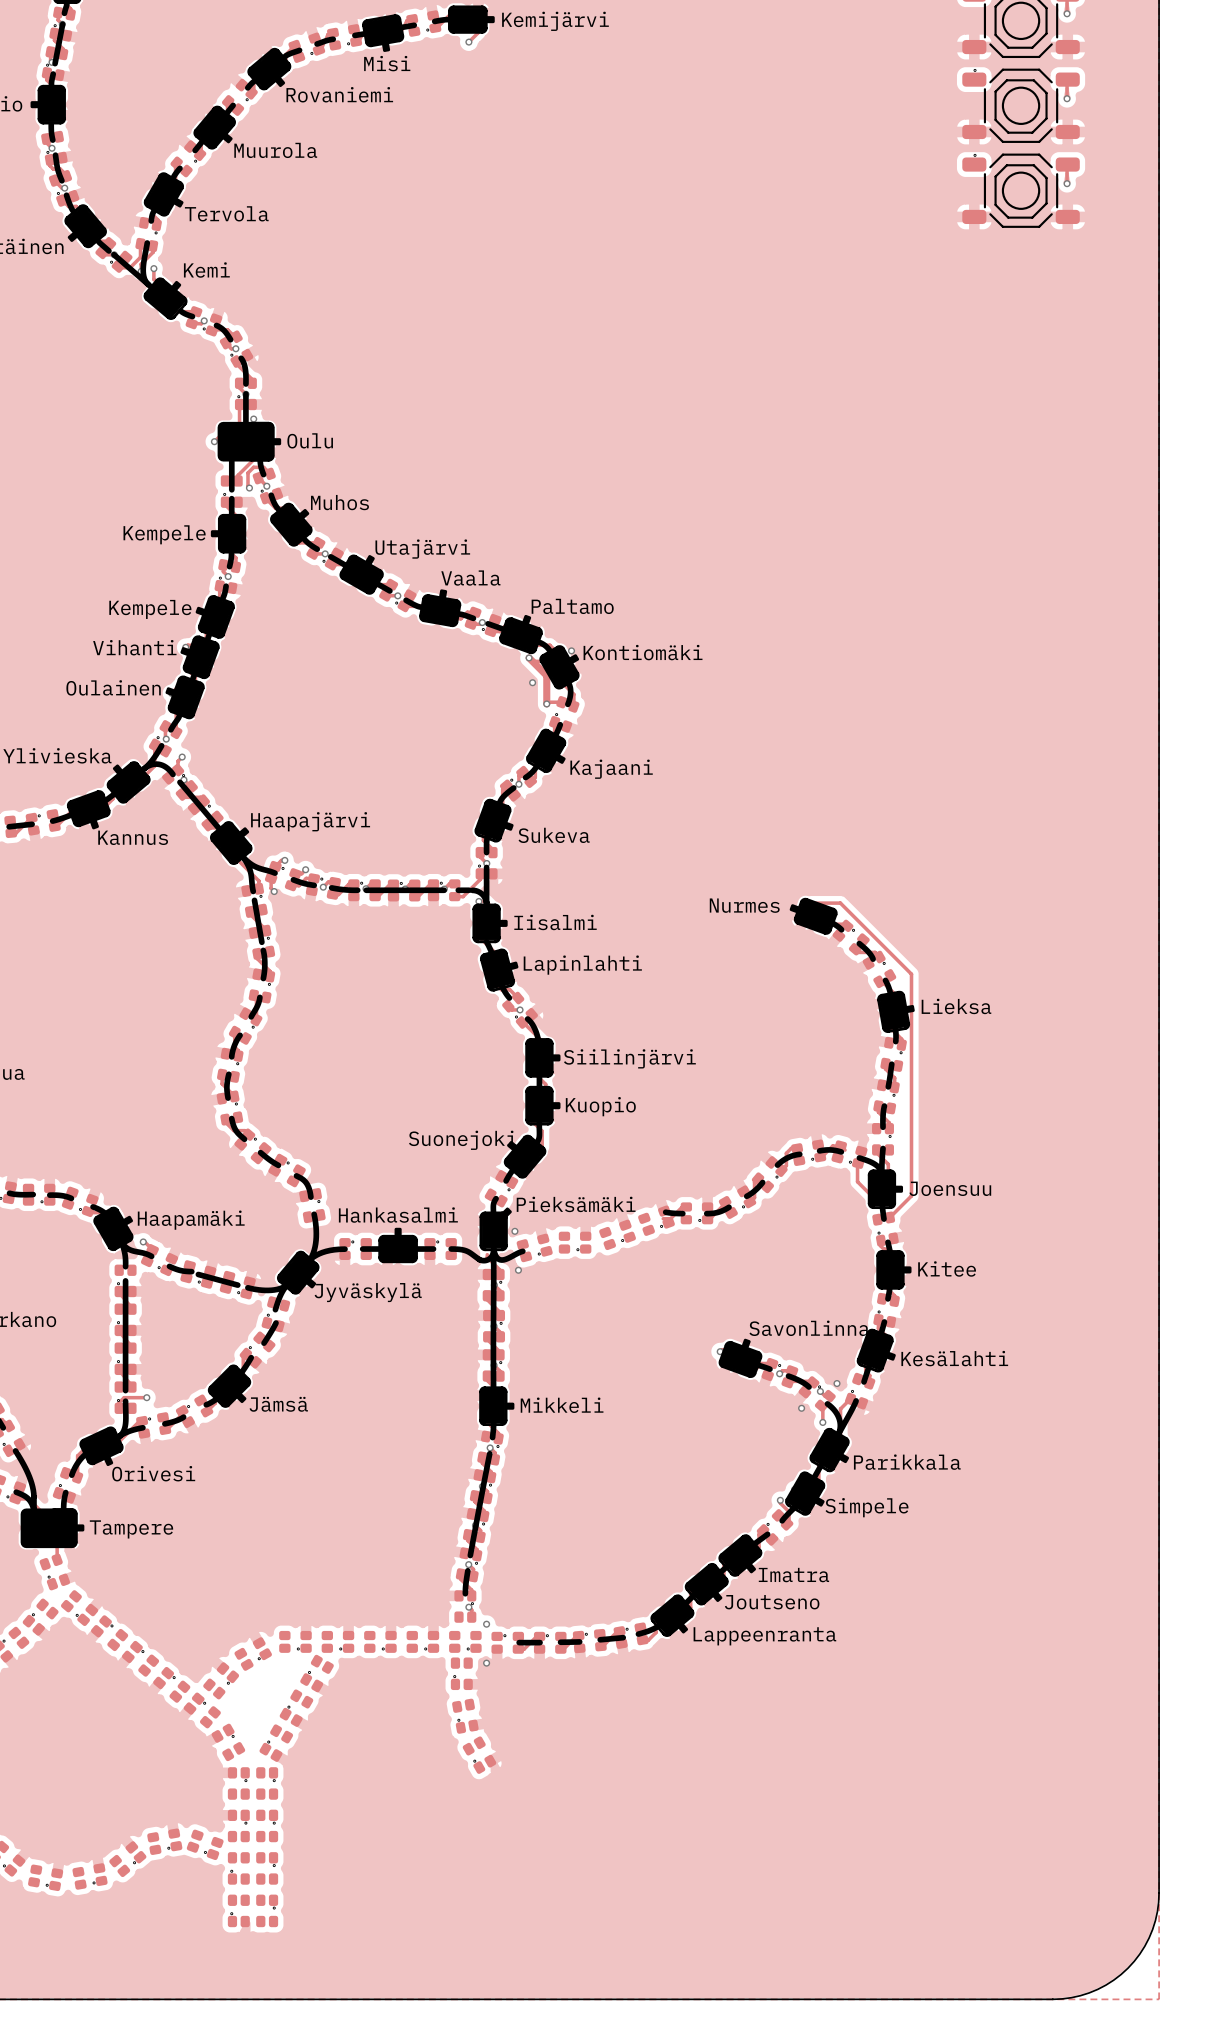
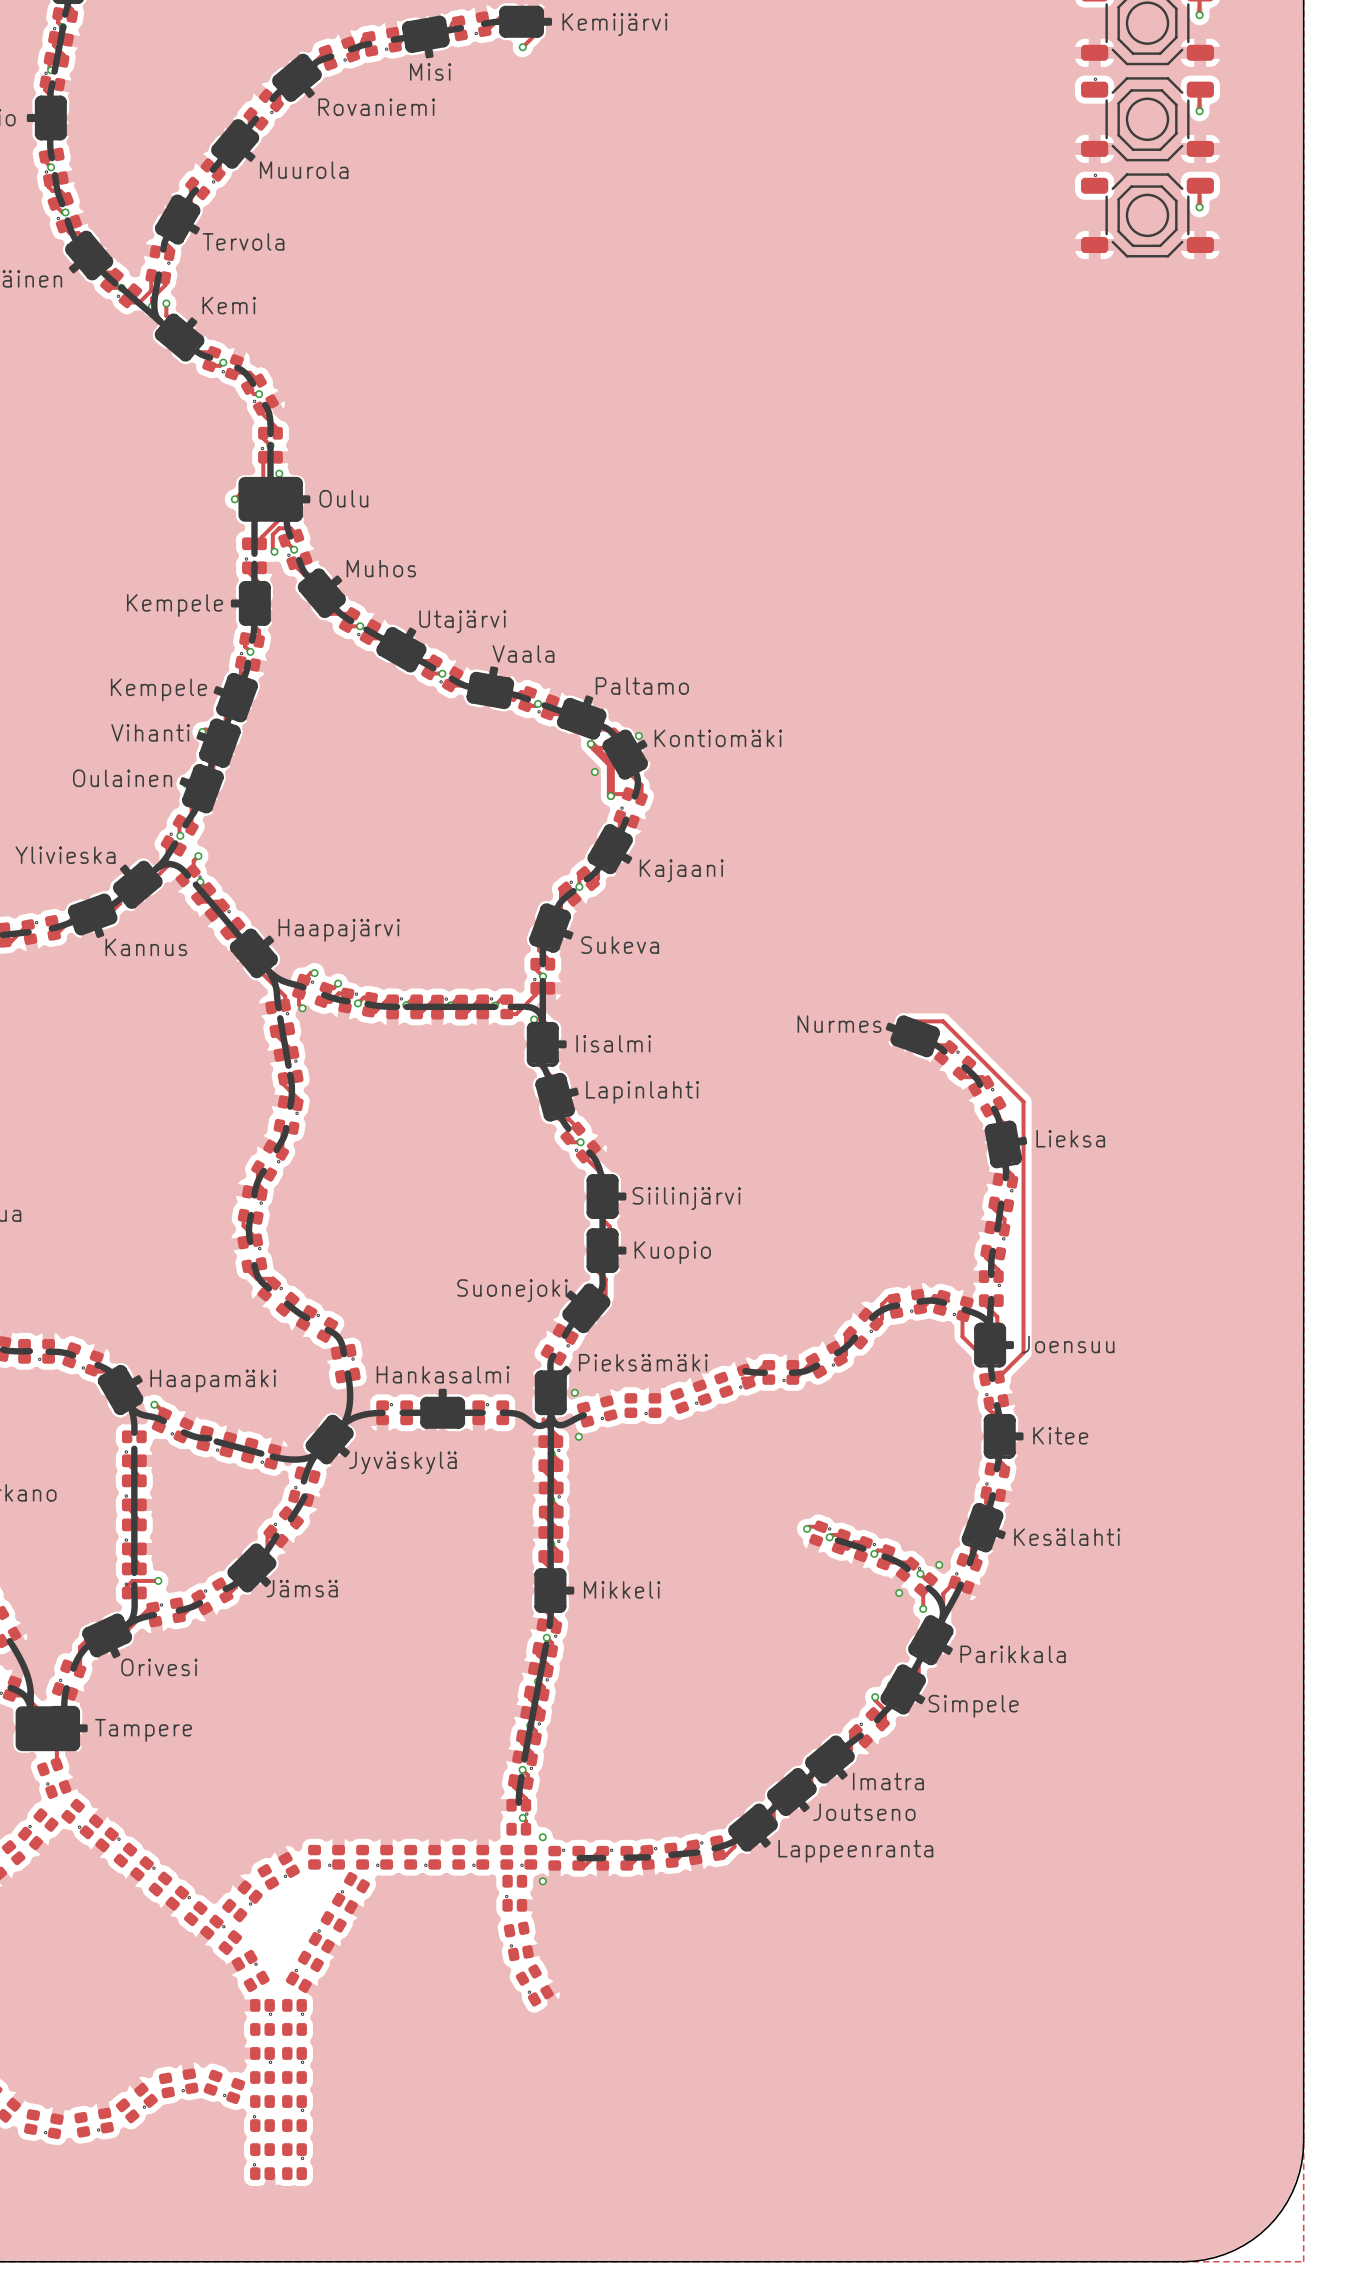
drawing: [718, 1338, 763, 1378] -> none

